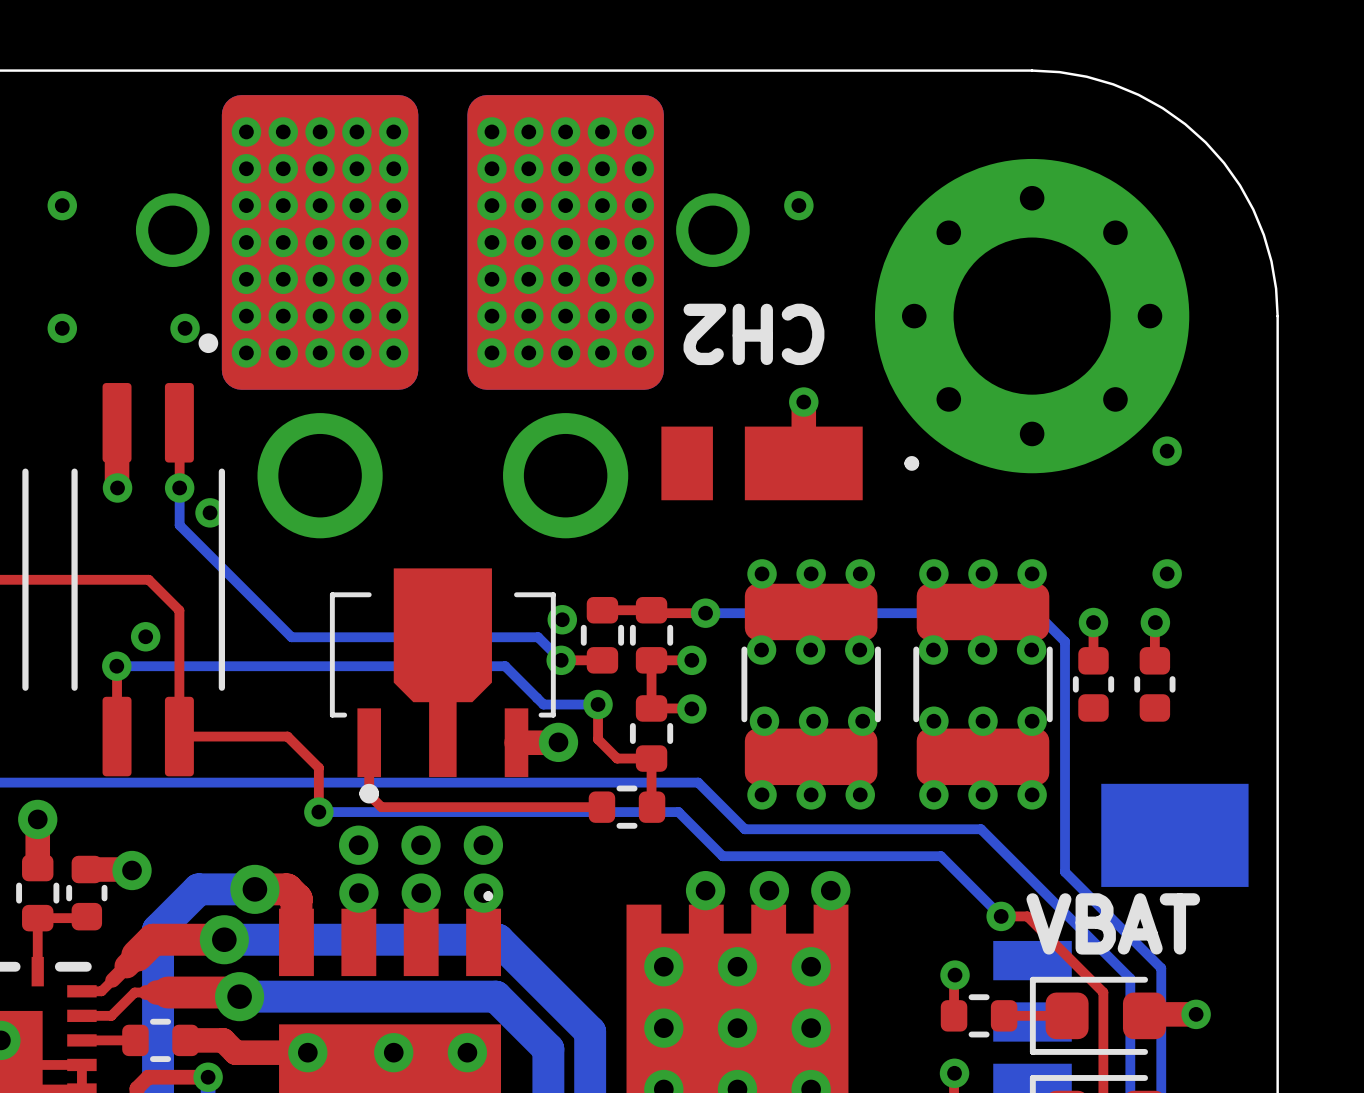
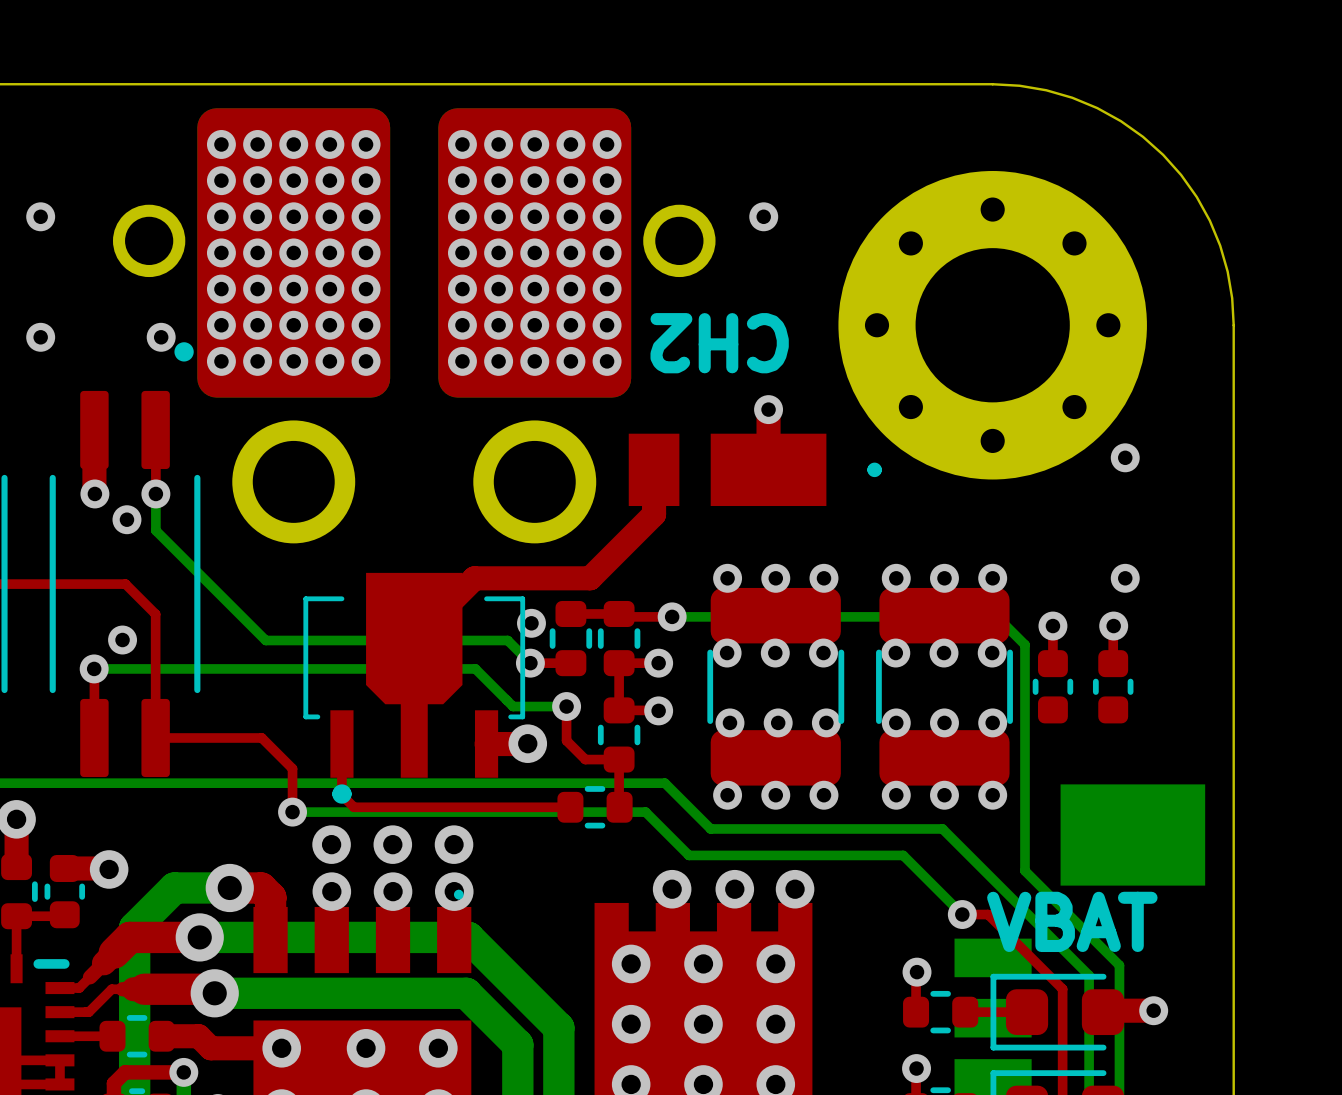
top track: none -> (654, 469) (654, 514) (590, 578) (474, 578) (414, 638)
via position: (210, 512) -> (126, 519)

